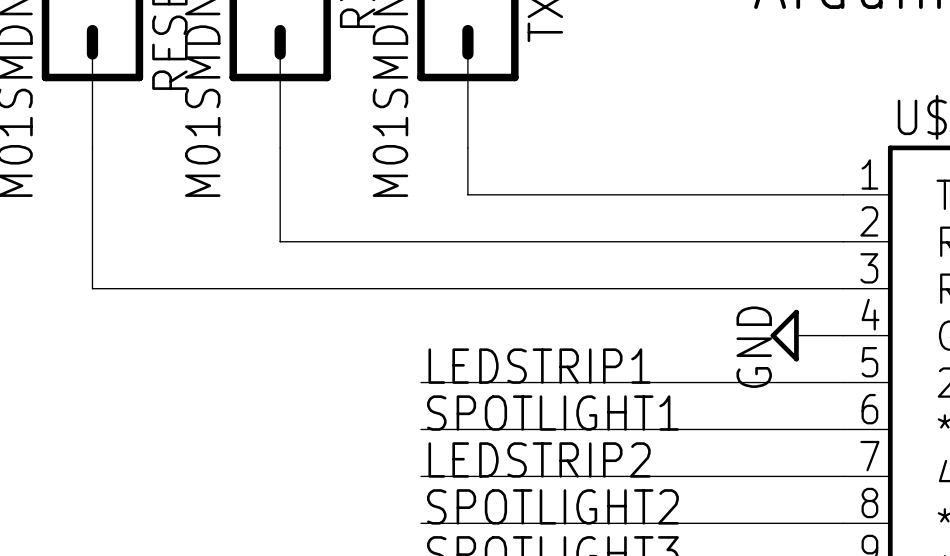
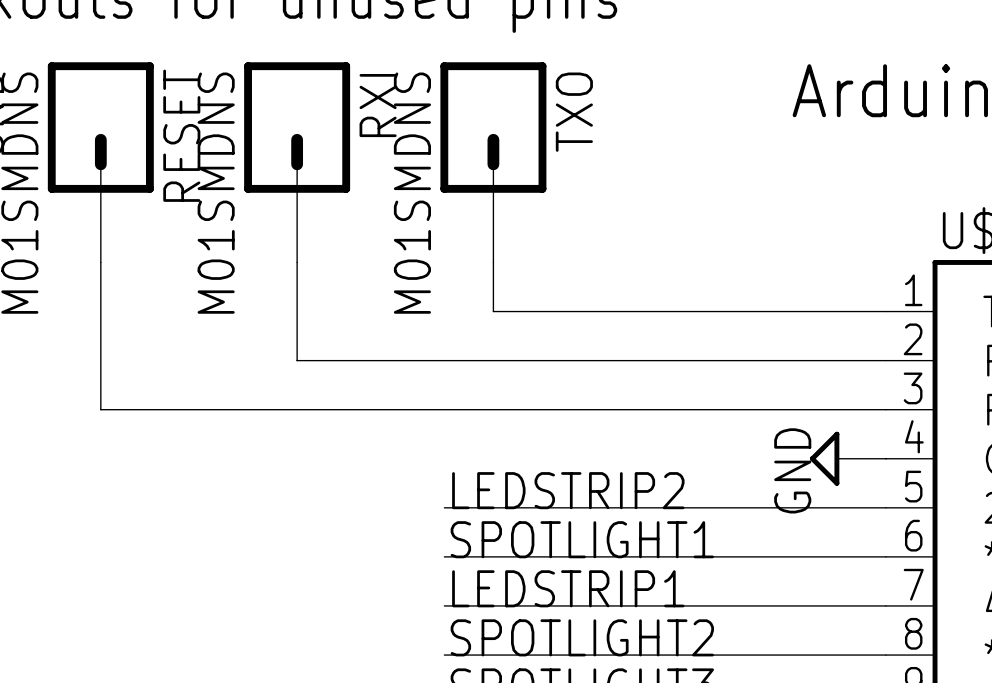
label: LEDSTRIP1 (539, 366) -> LEDSTRIP2 (568, 490)
label: LEDSTRIP2 (539, 459) -> LEDSTRIP1 (568, 588)

